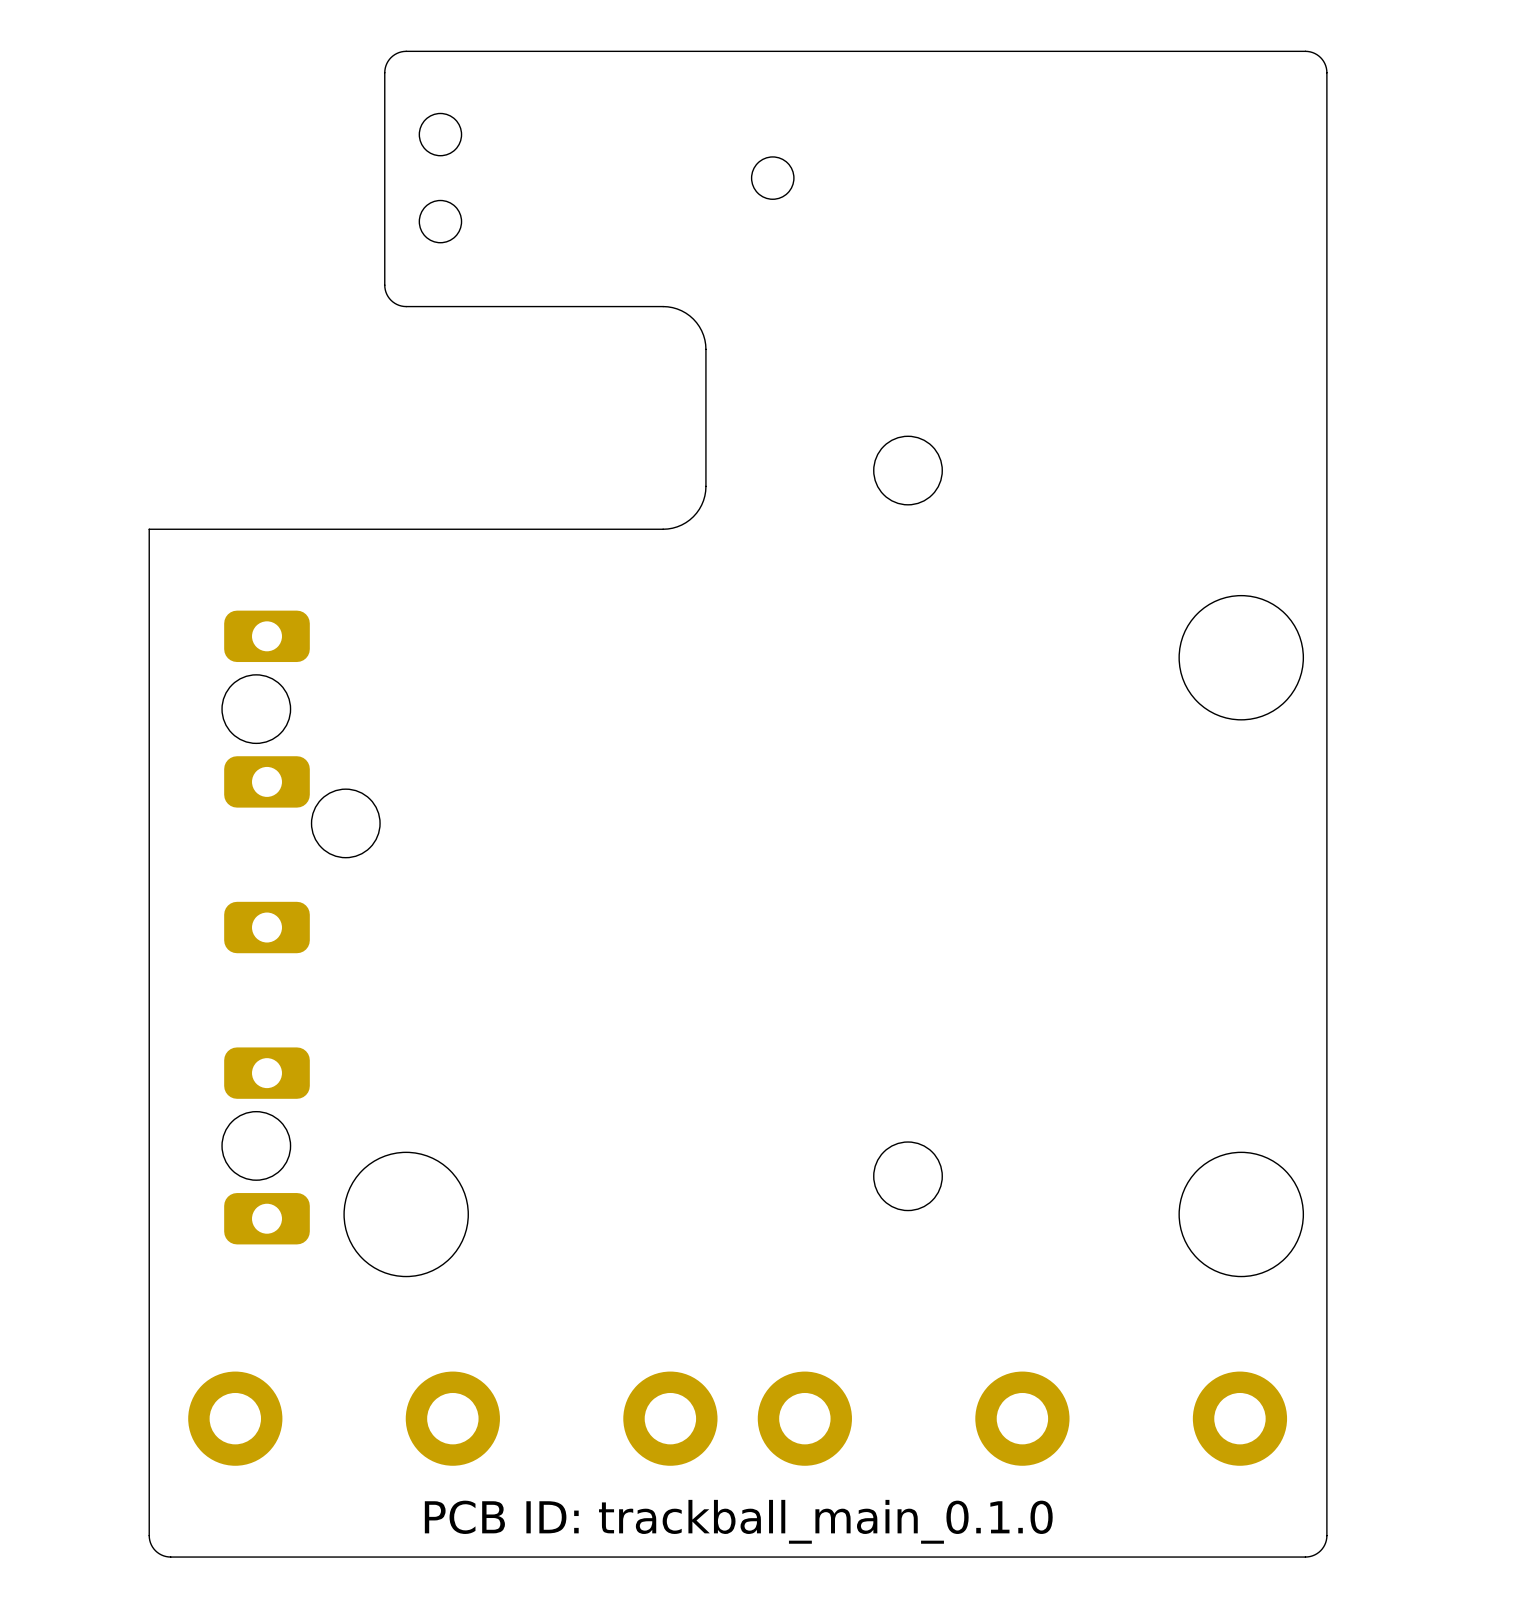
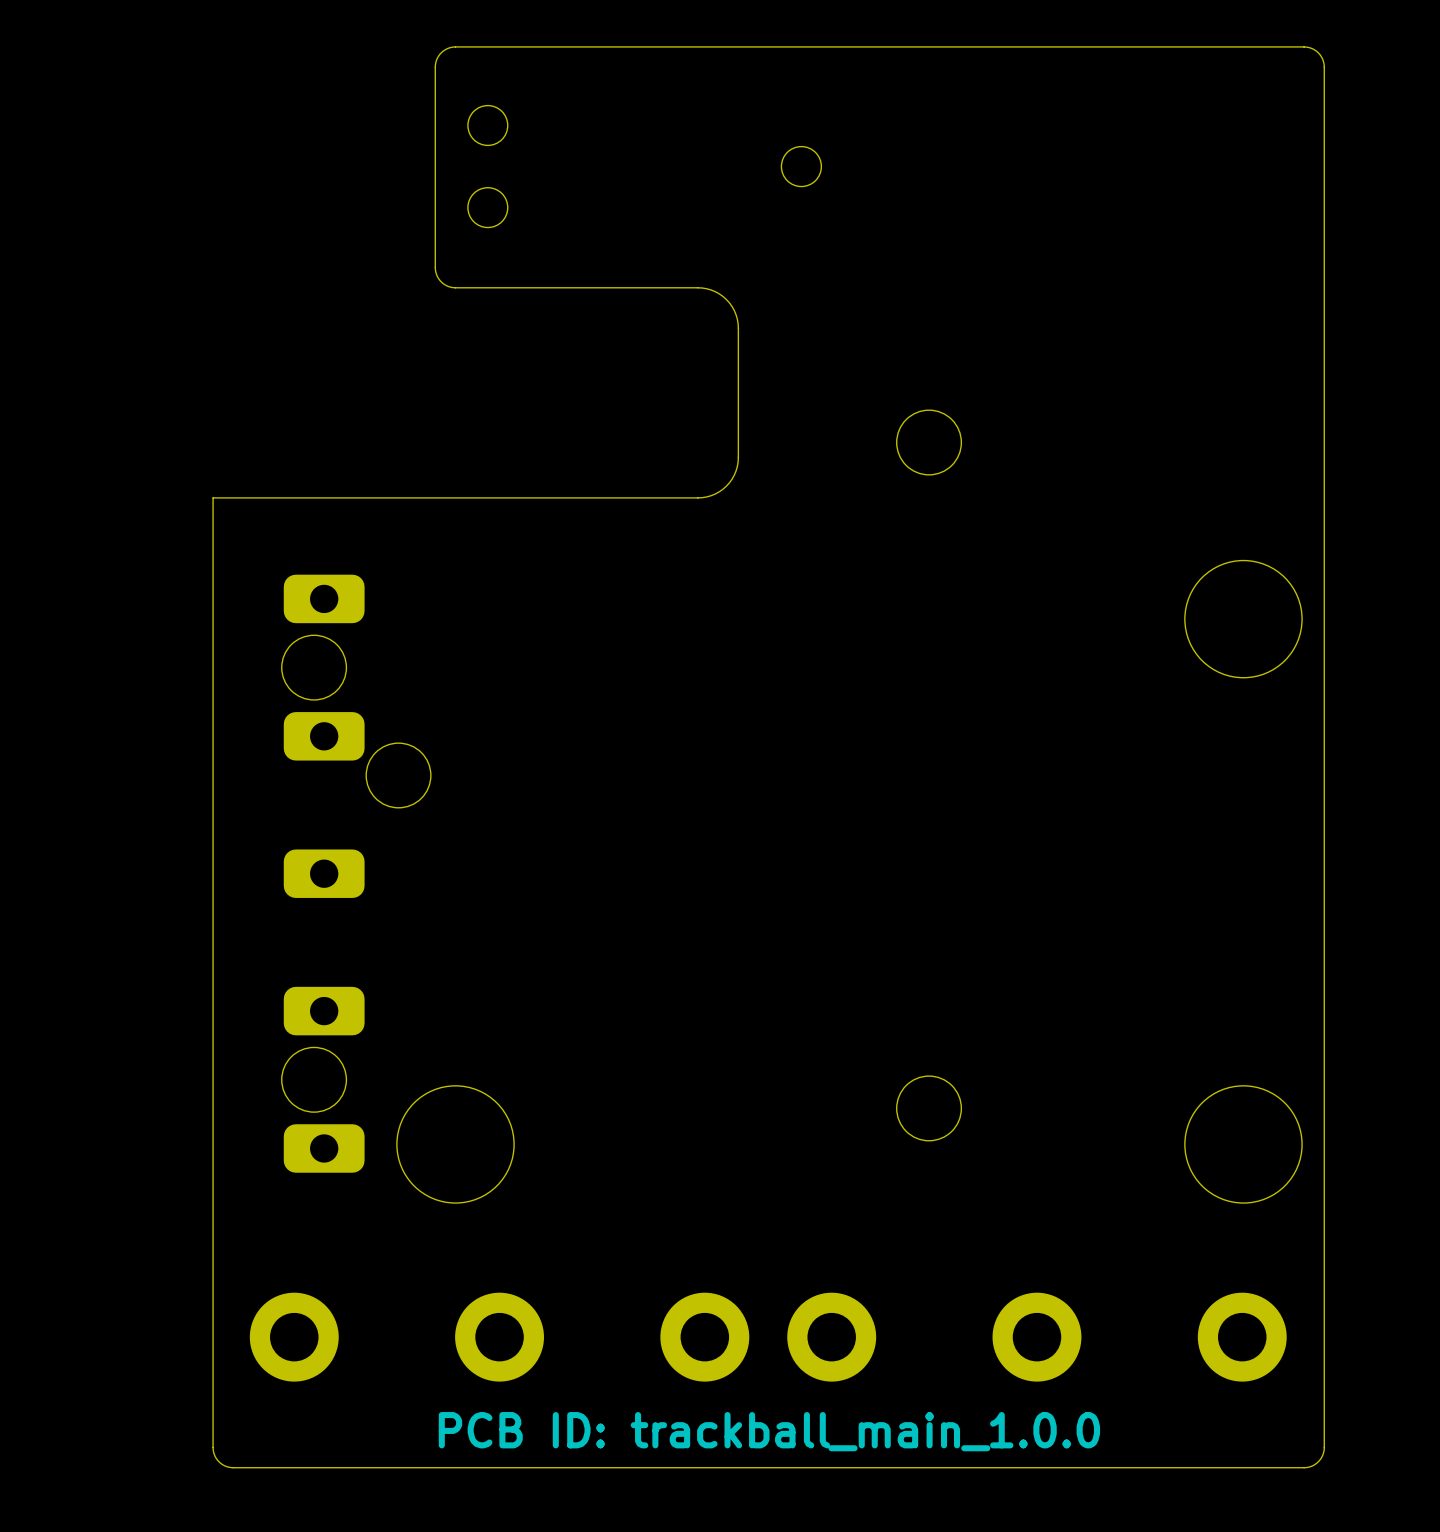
text: PCB ID: trackball_main_0.1.0 (738, 1521) -> PCB ID: trackball_main_1.0.0 (769, 1431)

